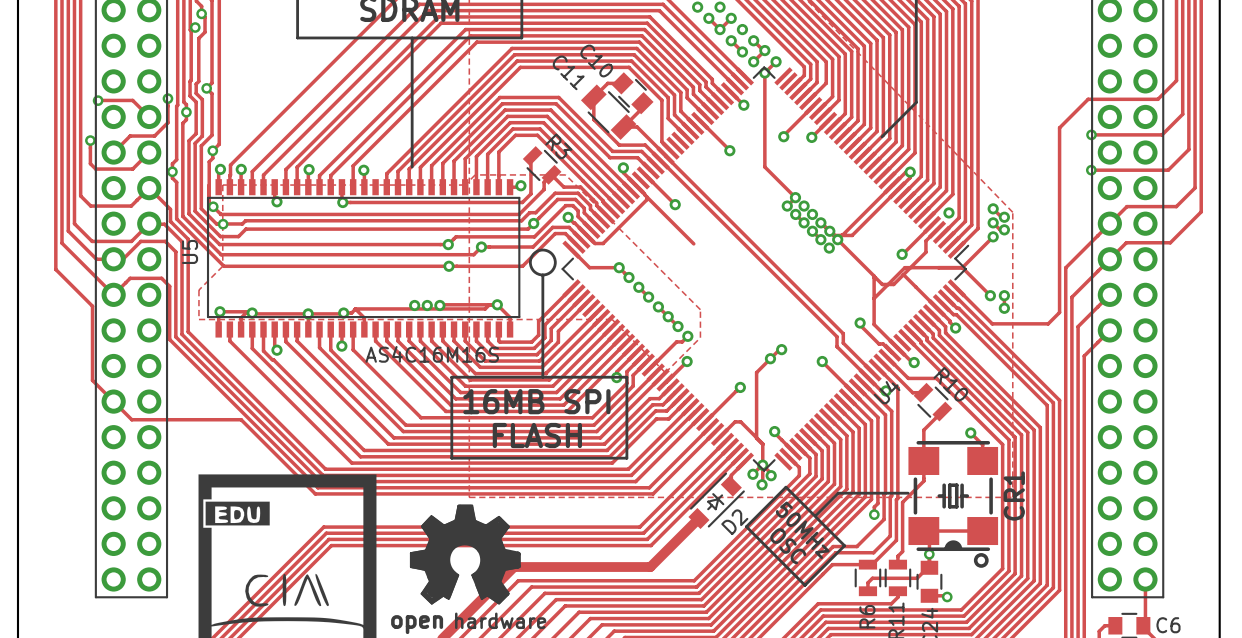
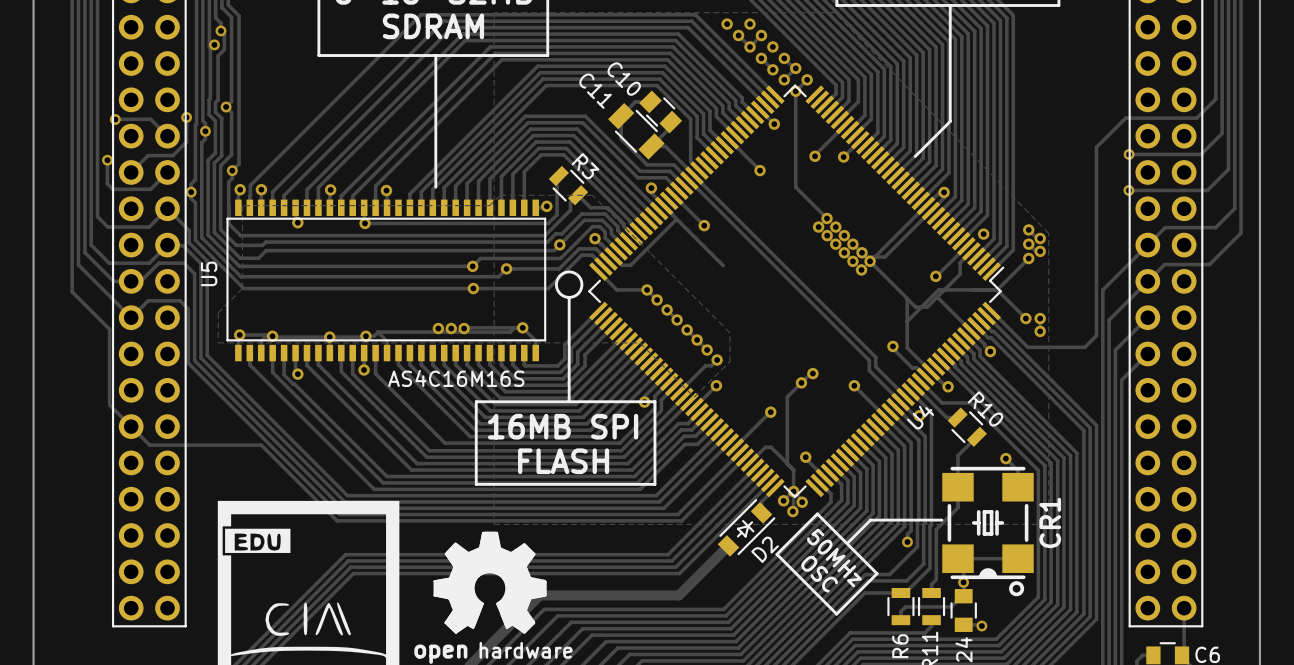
via: (213, 206) -> none
via: (223, 224) -> none

